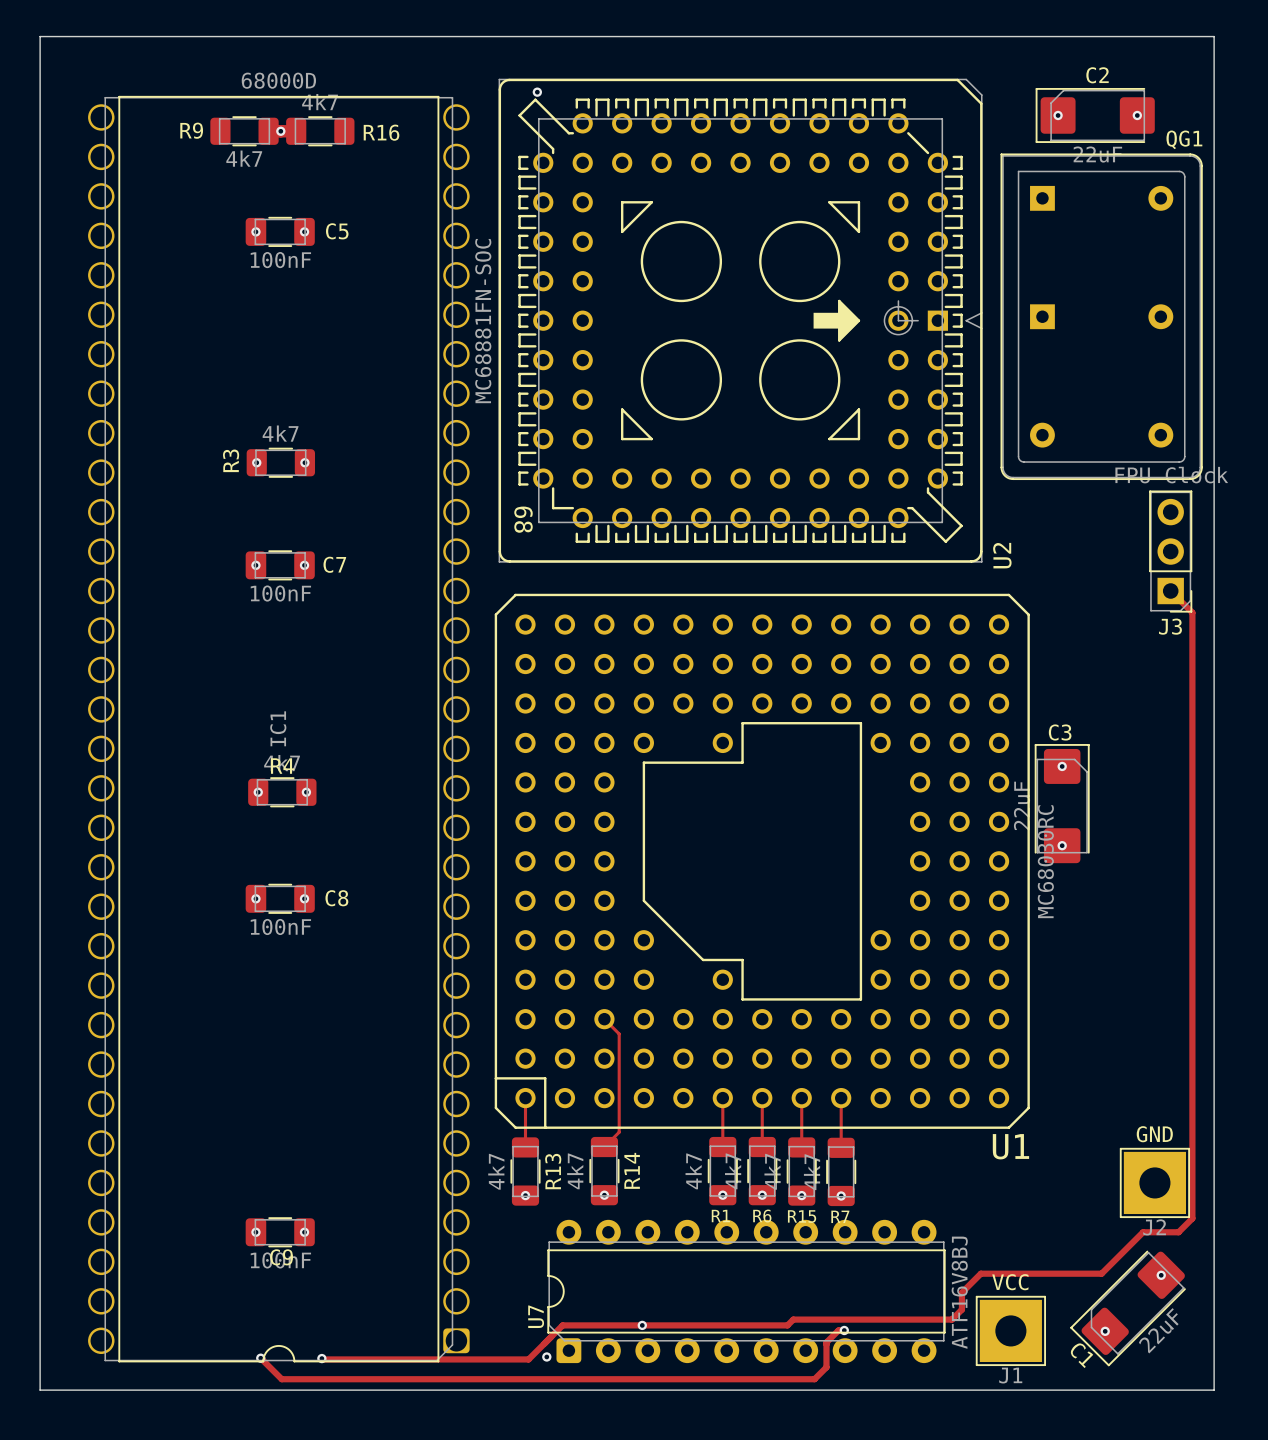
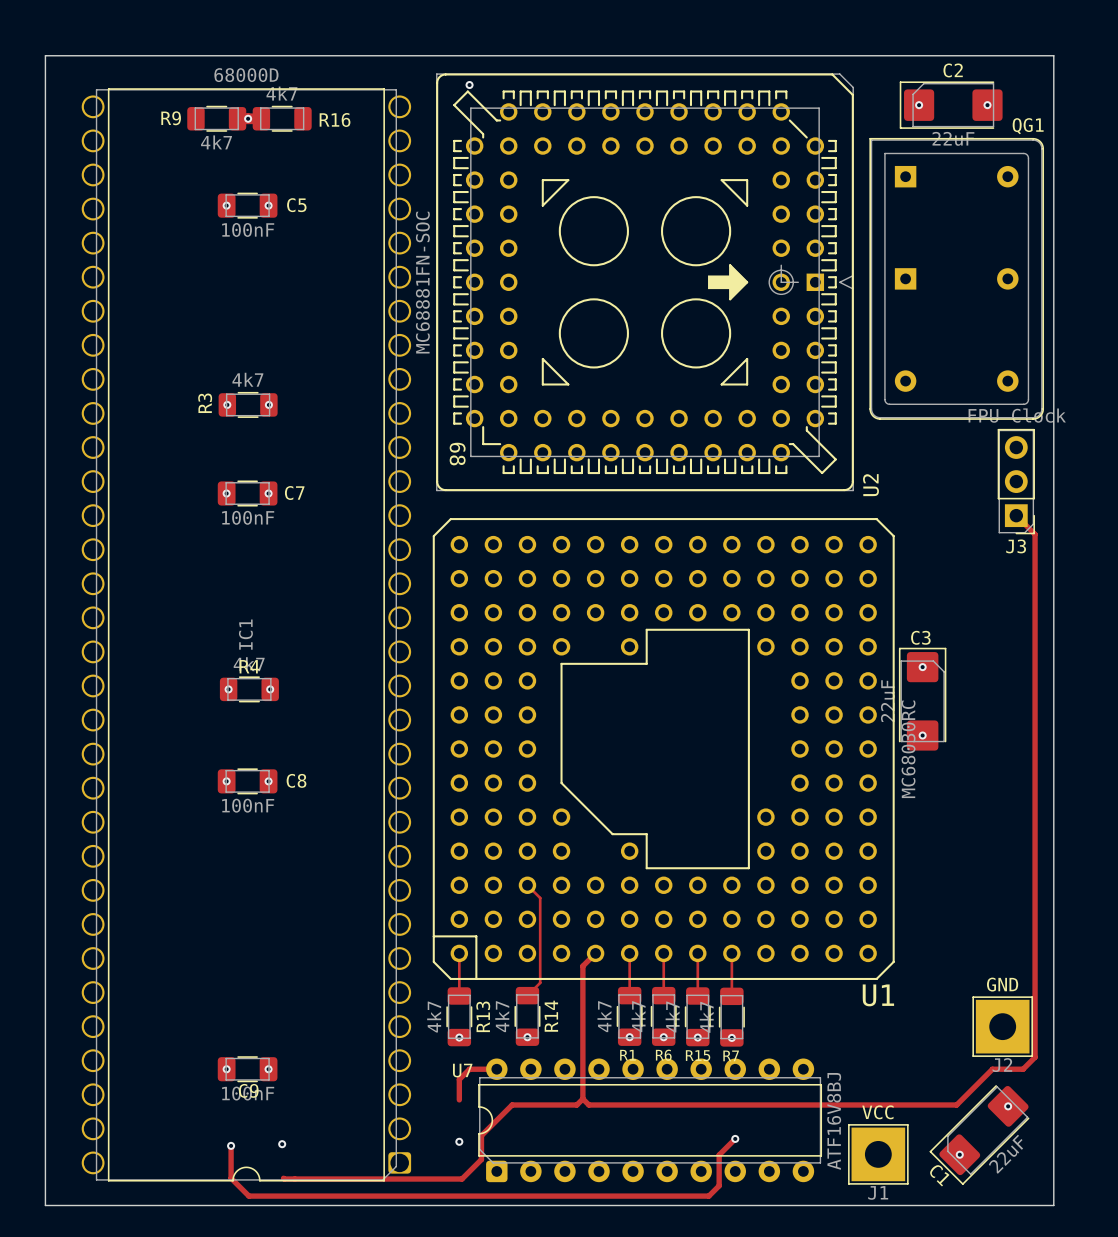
board edge: (1214, 58) (1214, 36) (40, 36) (40, 1390) (46, 1390) -> (1053, 55) (45, 55) (45, 1205)
track: none -> (595, 953) (582, 966) (582, 1098)
track: none -> (496, 1069) (469, 1069) (459, 1079) (459, 1099)
track: none -> (582, 1098) (576, 1105) (512, 1105) (481, 1135) (481, 1159)
track: (980, 1273) (961, 1292) (961, 1309) (951, 1319) (793, 1319) (787, 1325) (562, 1325) (551, 1336) -> (852, 1105) (588, 1105) (582, 1098)
U7 name rotation: 0° (536, 1316) -> 90° clockwise (462, 1070)
U7 name position: U7 (536, 1316) -> U7 (462, 1070)
via: none -> (282, 1144)
track: none -> (231, 1145) (231, 1178)
via: none -> (231, 1145)
via: (642, 1325) -> none
track: (844, 1330) (838, 1330) (826, 1342) -> (735, 1138) (719, 1155) (719, 1164)
via position: (844, 1330) -> (735, 1138)
via position: (546, 1356) -> (459, 1141)
via: (260, 1358) -> none
via: (321, 1358) -> none

